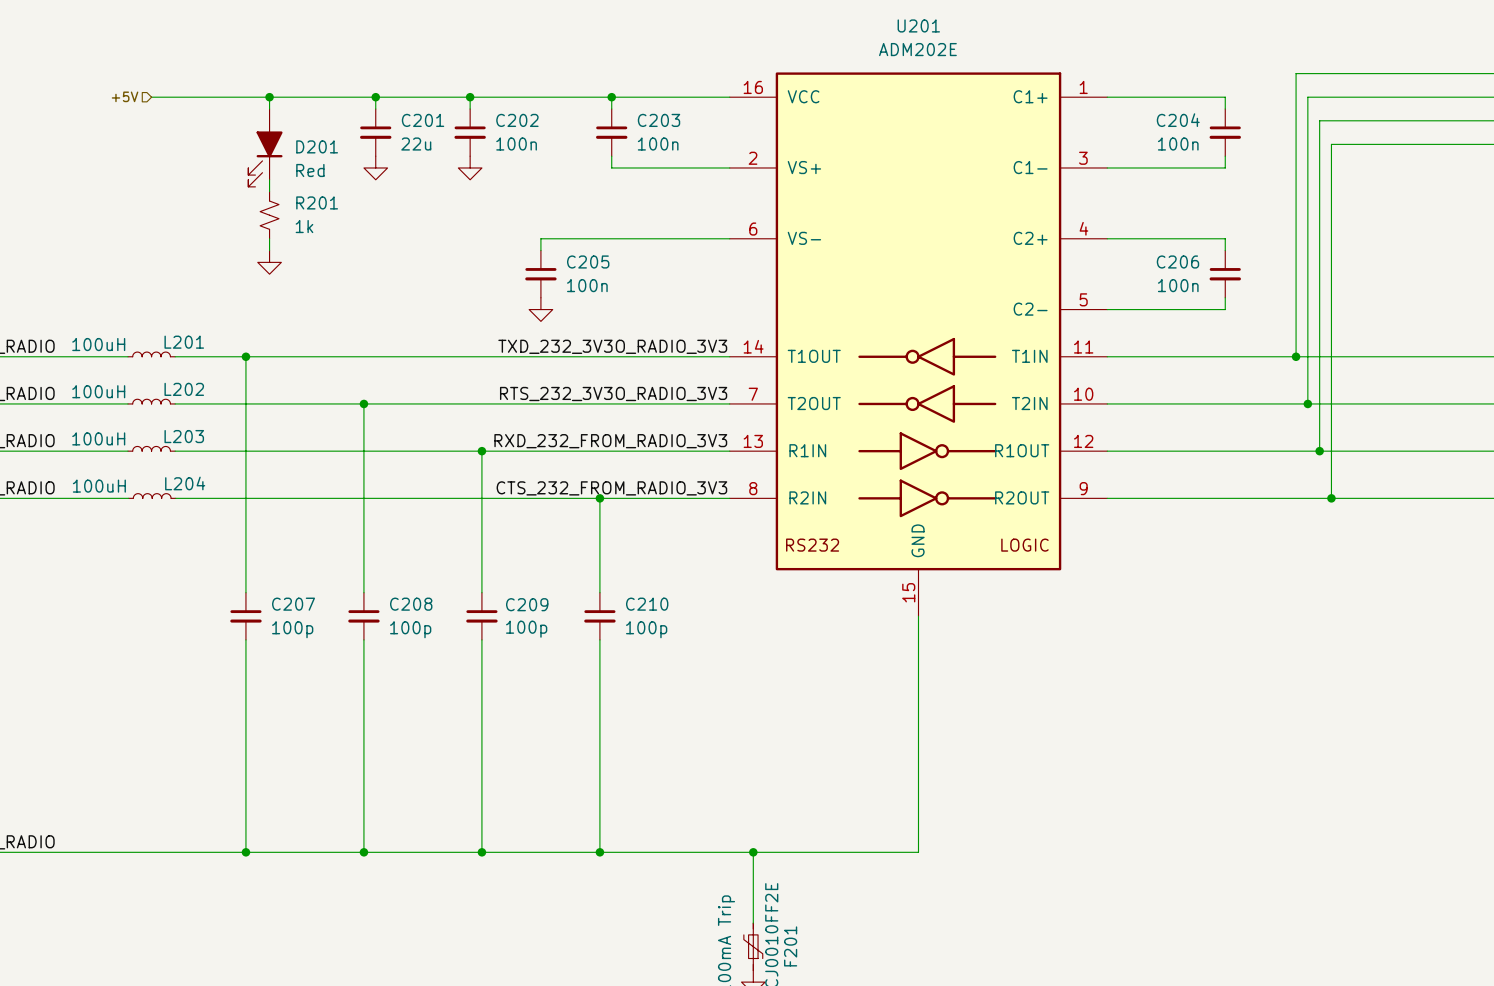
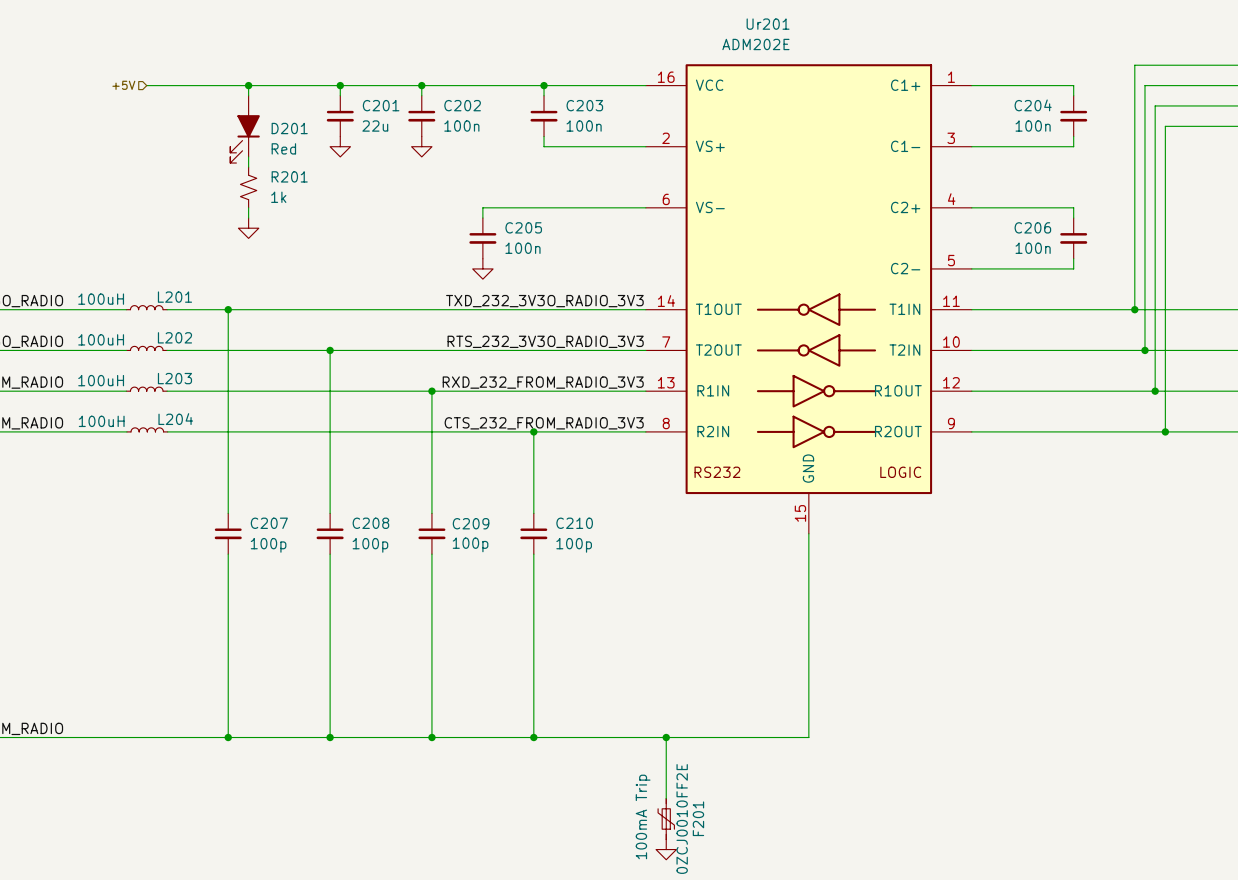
U201 name: U201 (918, 25) -> Ur201 (768, 24)
U201 value position: ADM202E (917, 49) -> ADM202E (755, 44)

